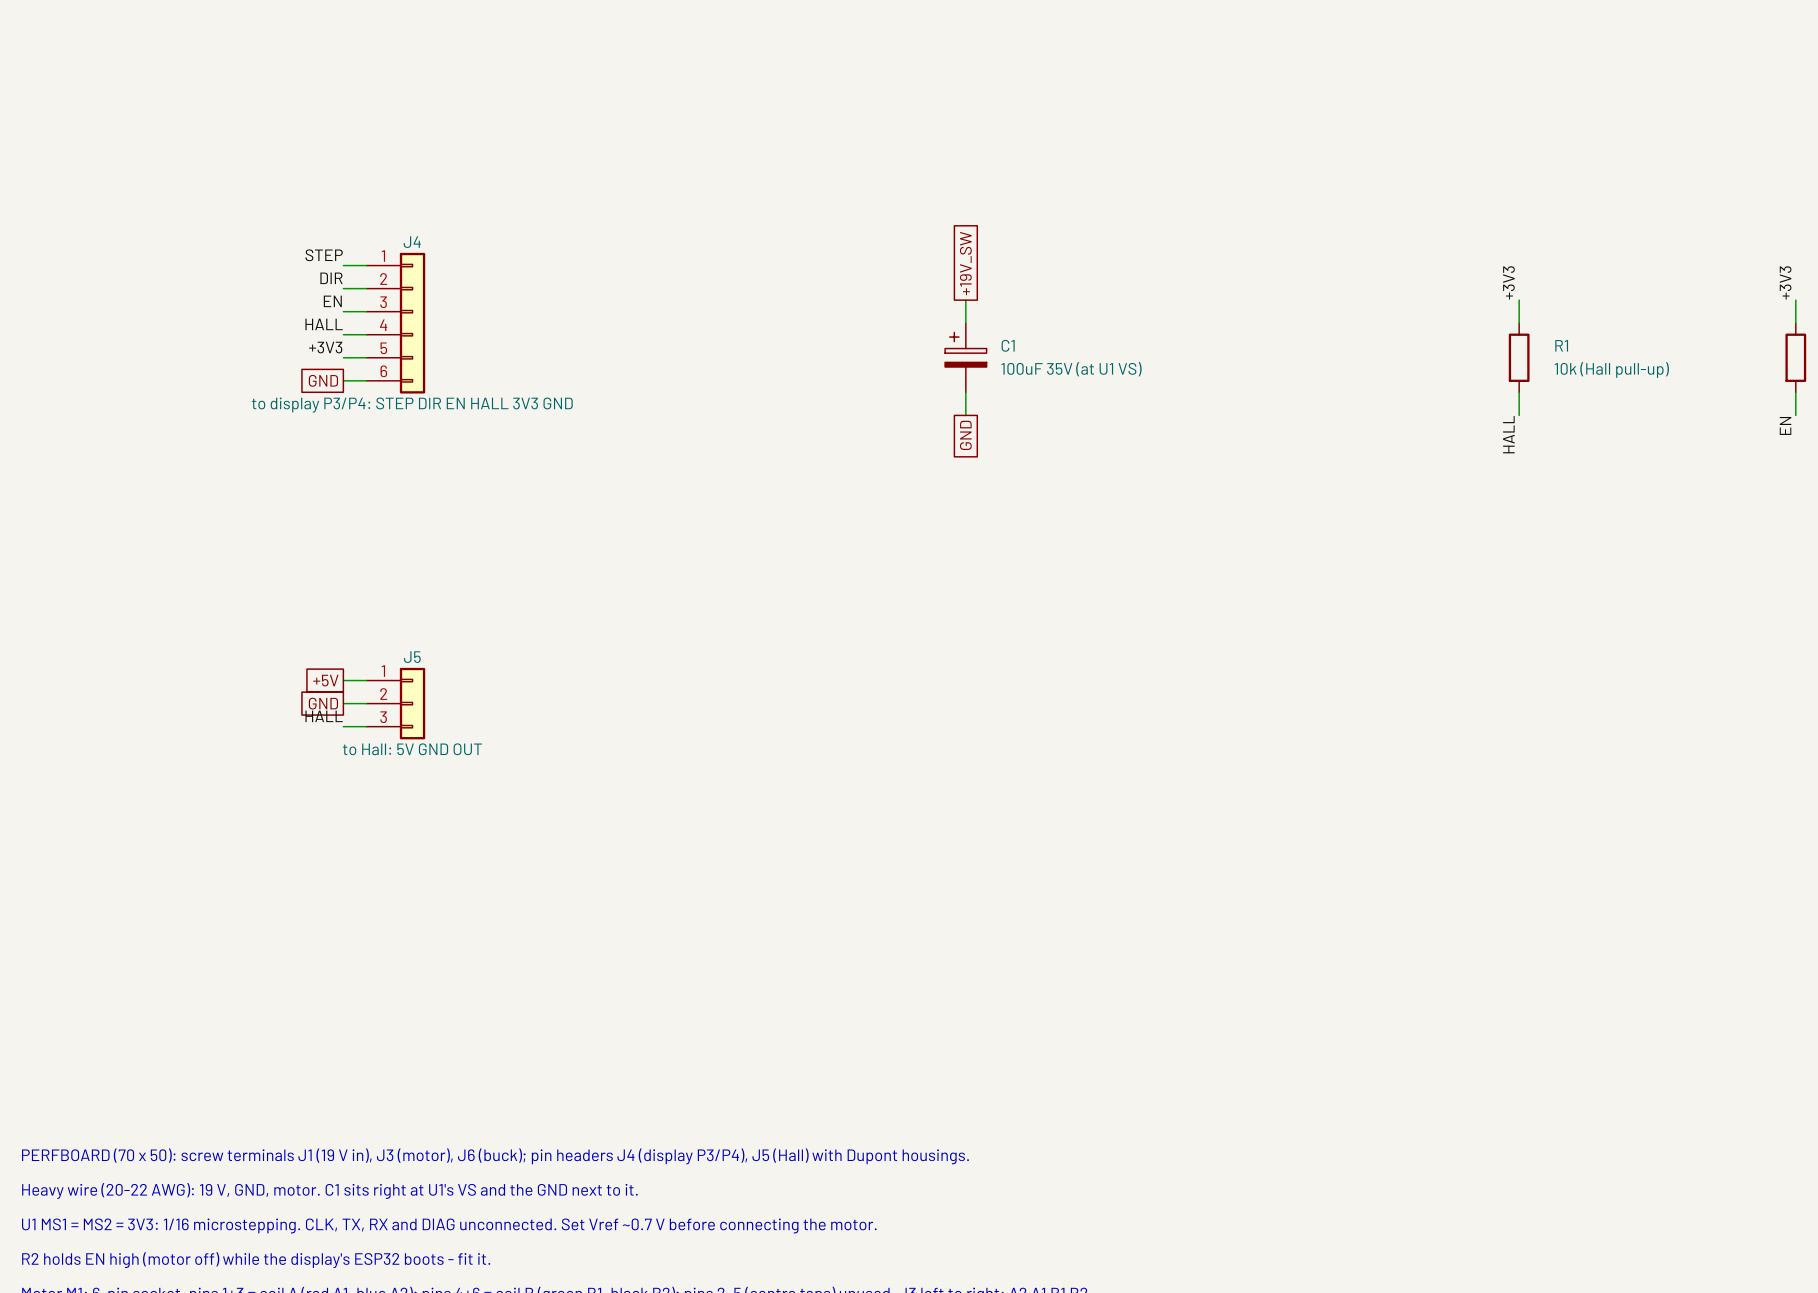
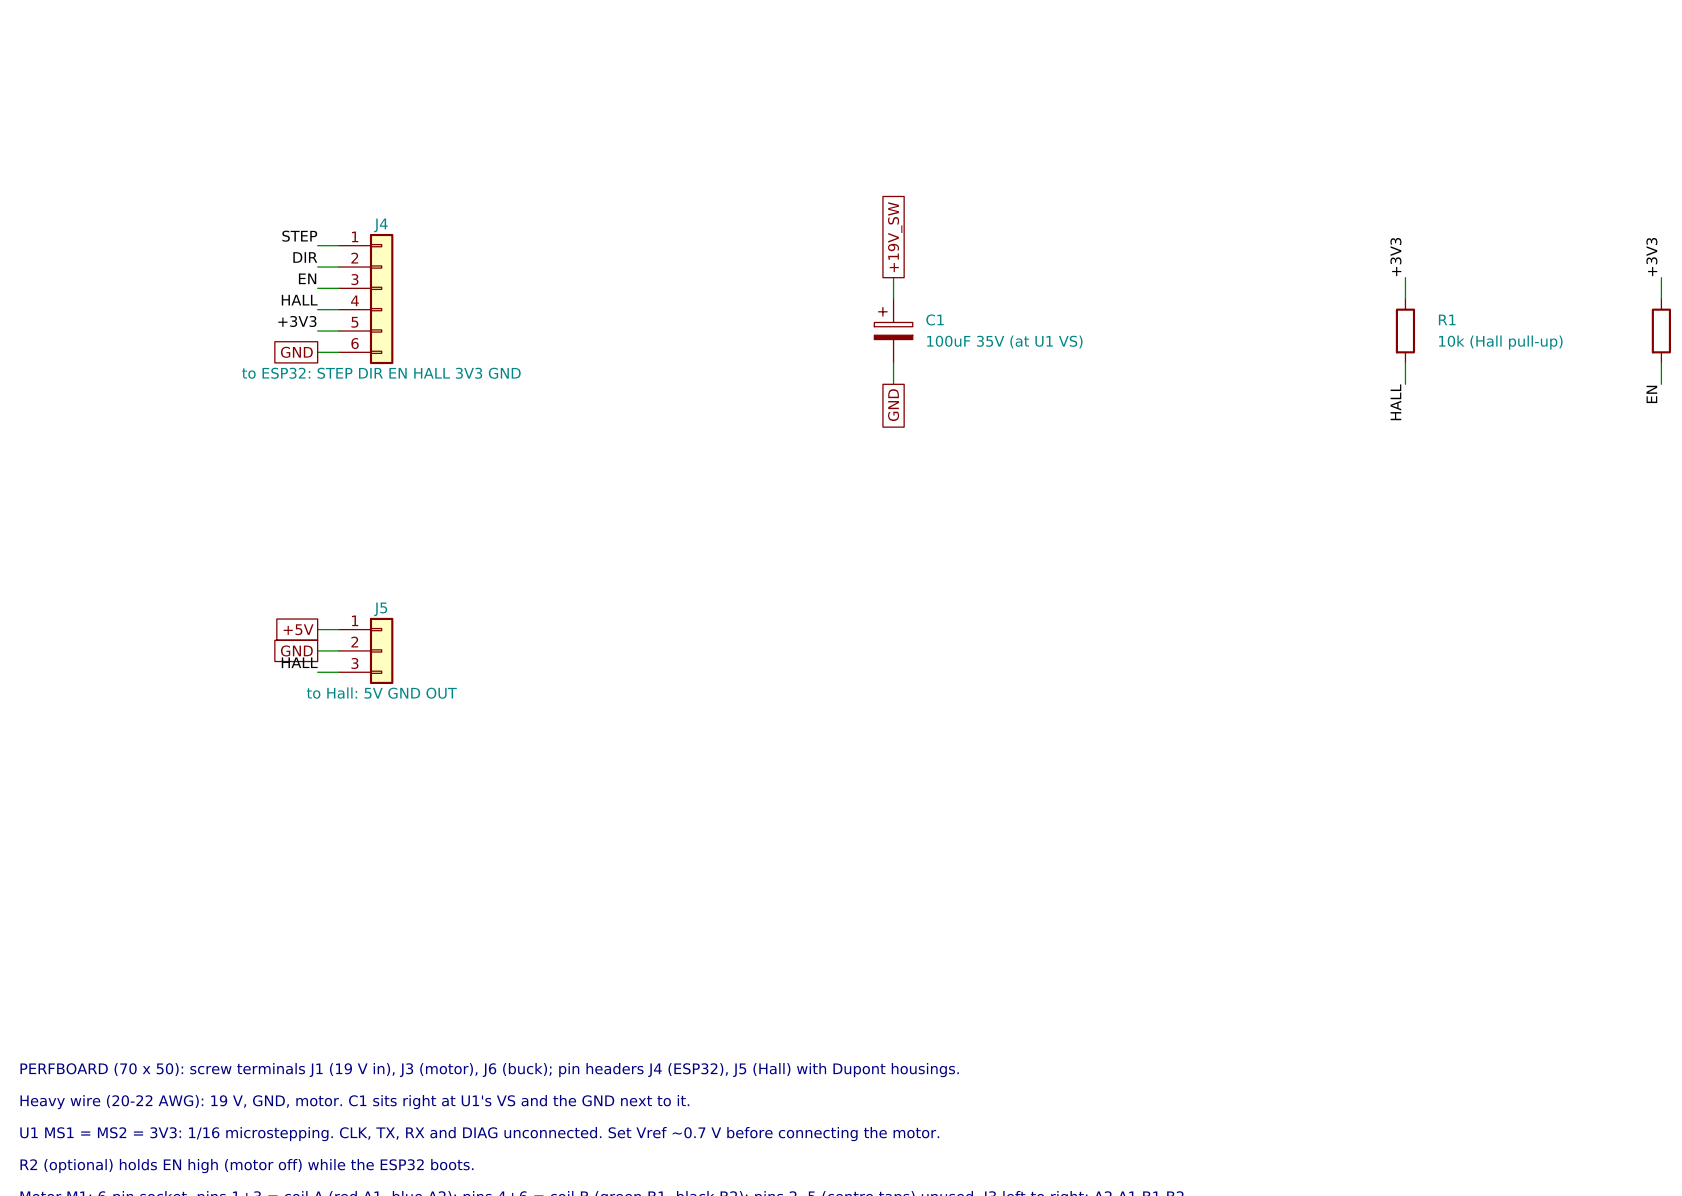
J4 value: to display P3/P4: STEP DIR EN HALL 3V3 GND (412, 405) -> to ESP32: STEP DIR EN HALL 3V3 GND (381, 373)
text: PERFBOARD (70 x 50): screw terminals J1 (19 V in), J3 (motor), J6 (buck); pin headers J4 (display P3/P4), J5 (Hall) with Dupont housings. (495, 1156) -> PERFBOARD (70 x 50): screw terminals J1 (19 V in), J3 (motor), J6 (buck); pin headers J4 (ESP32), J5 (Hall) with Dupont housings. (489, 1070)
text: R2 holds EN high (motor off) while the display's ESP32 boots - fit it. (256, 1260) -> R2 (optional) holds EN high (motor off) while the ESP32 boots. (246, 1166)

